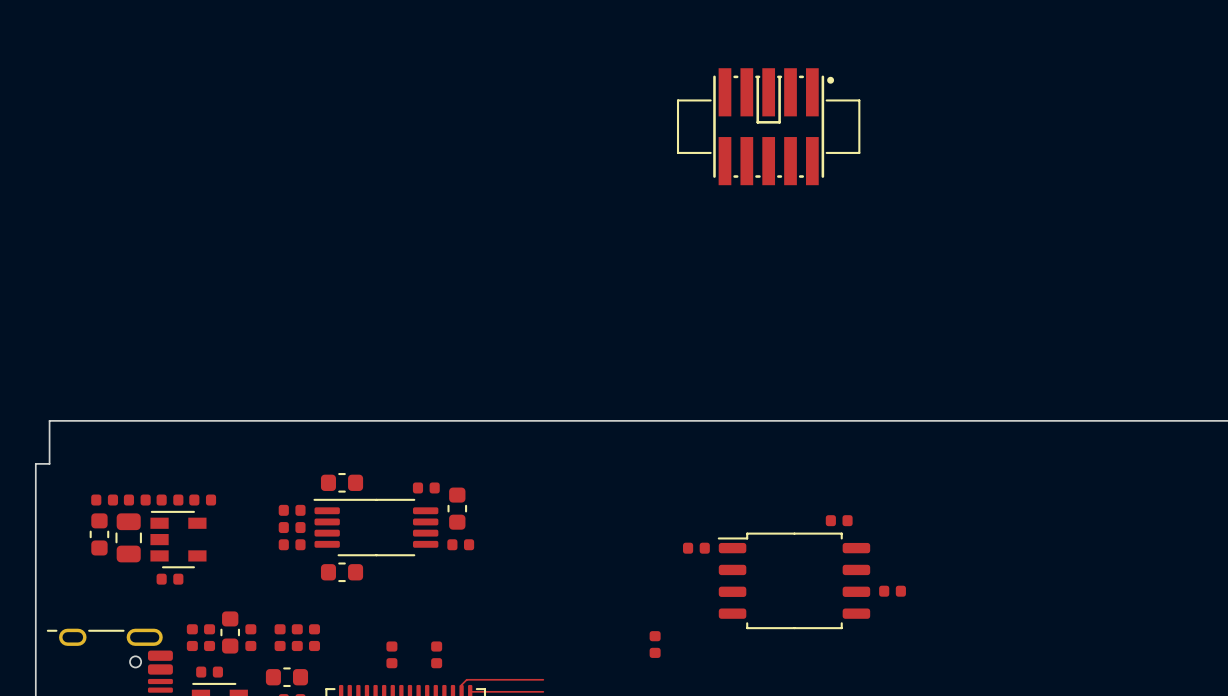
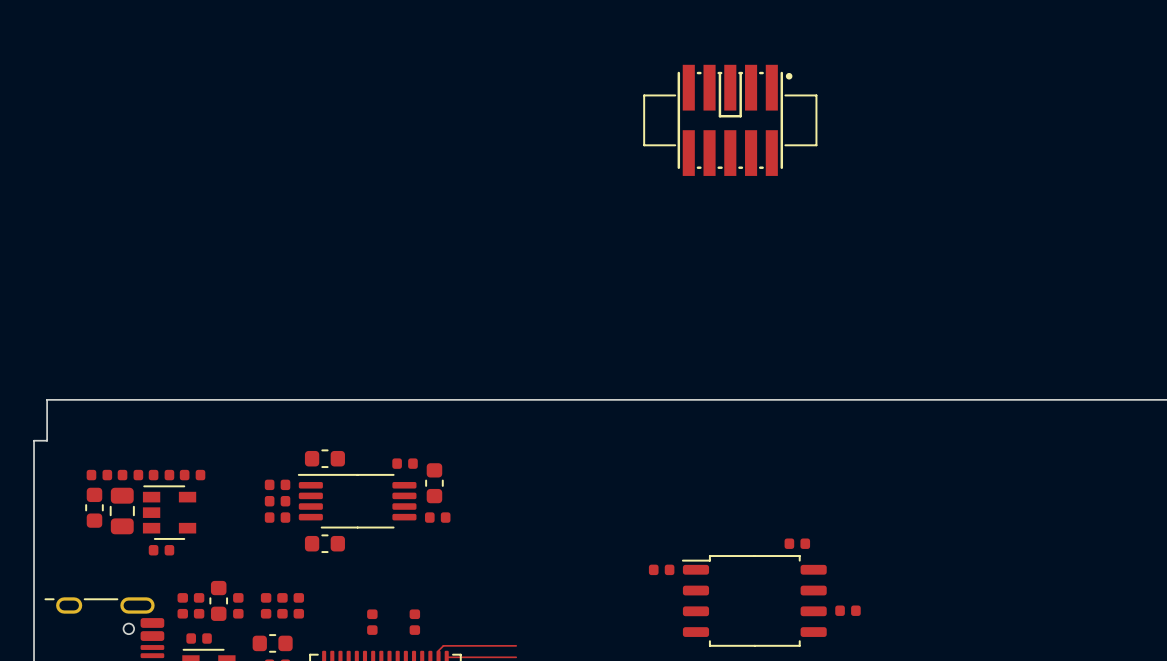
part: (839, 520) -> none
part: (696, 548) -> none
part: none -> (797, 543)
part position: (793, 580) -> (754, 600)
part: (892, 591) -> none
part: none -> (661, 569)
part: none -> (847, 610)
part: (655, 644) -> none

